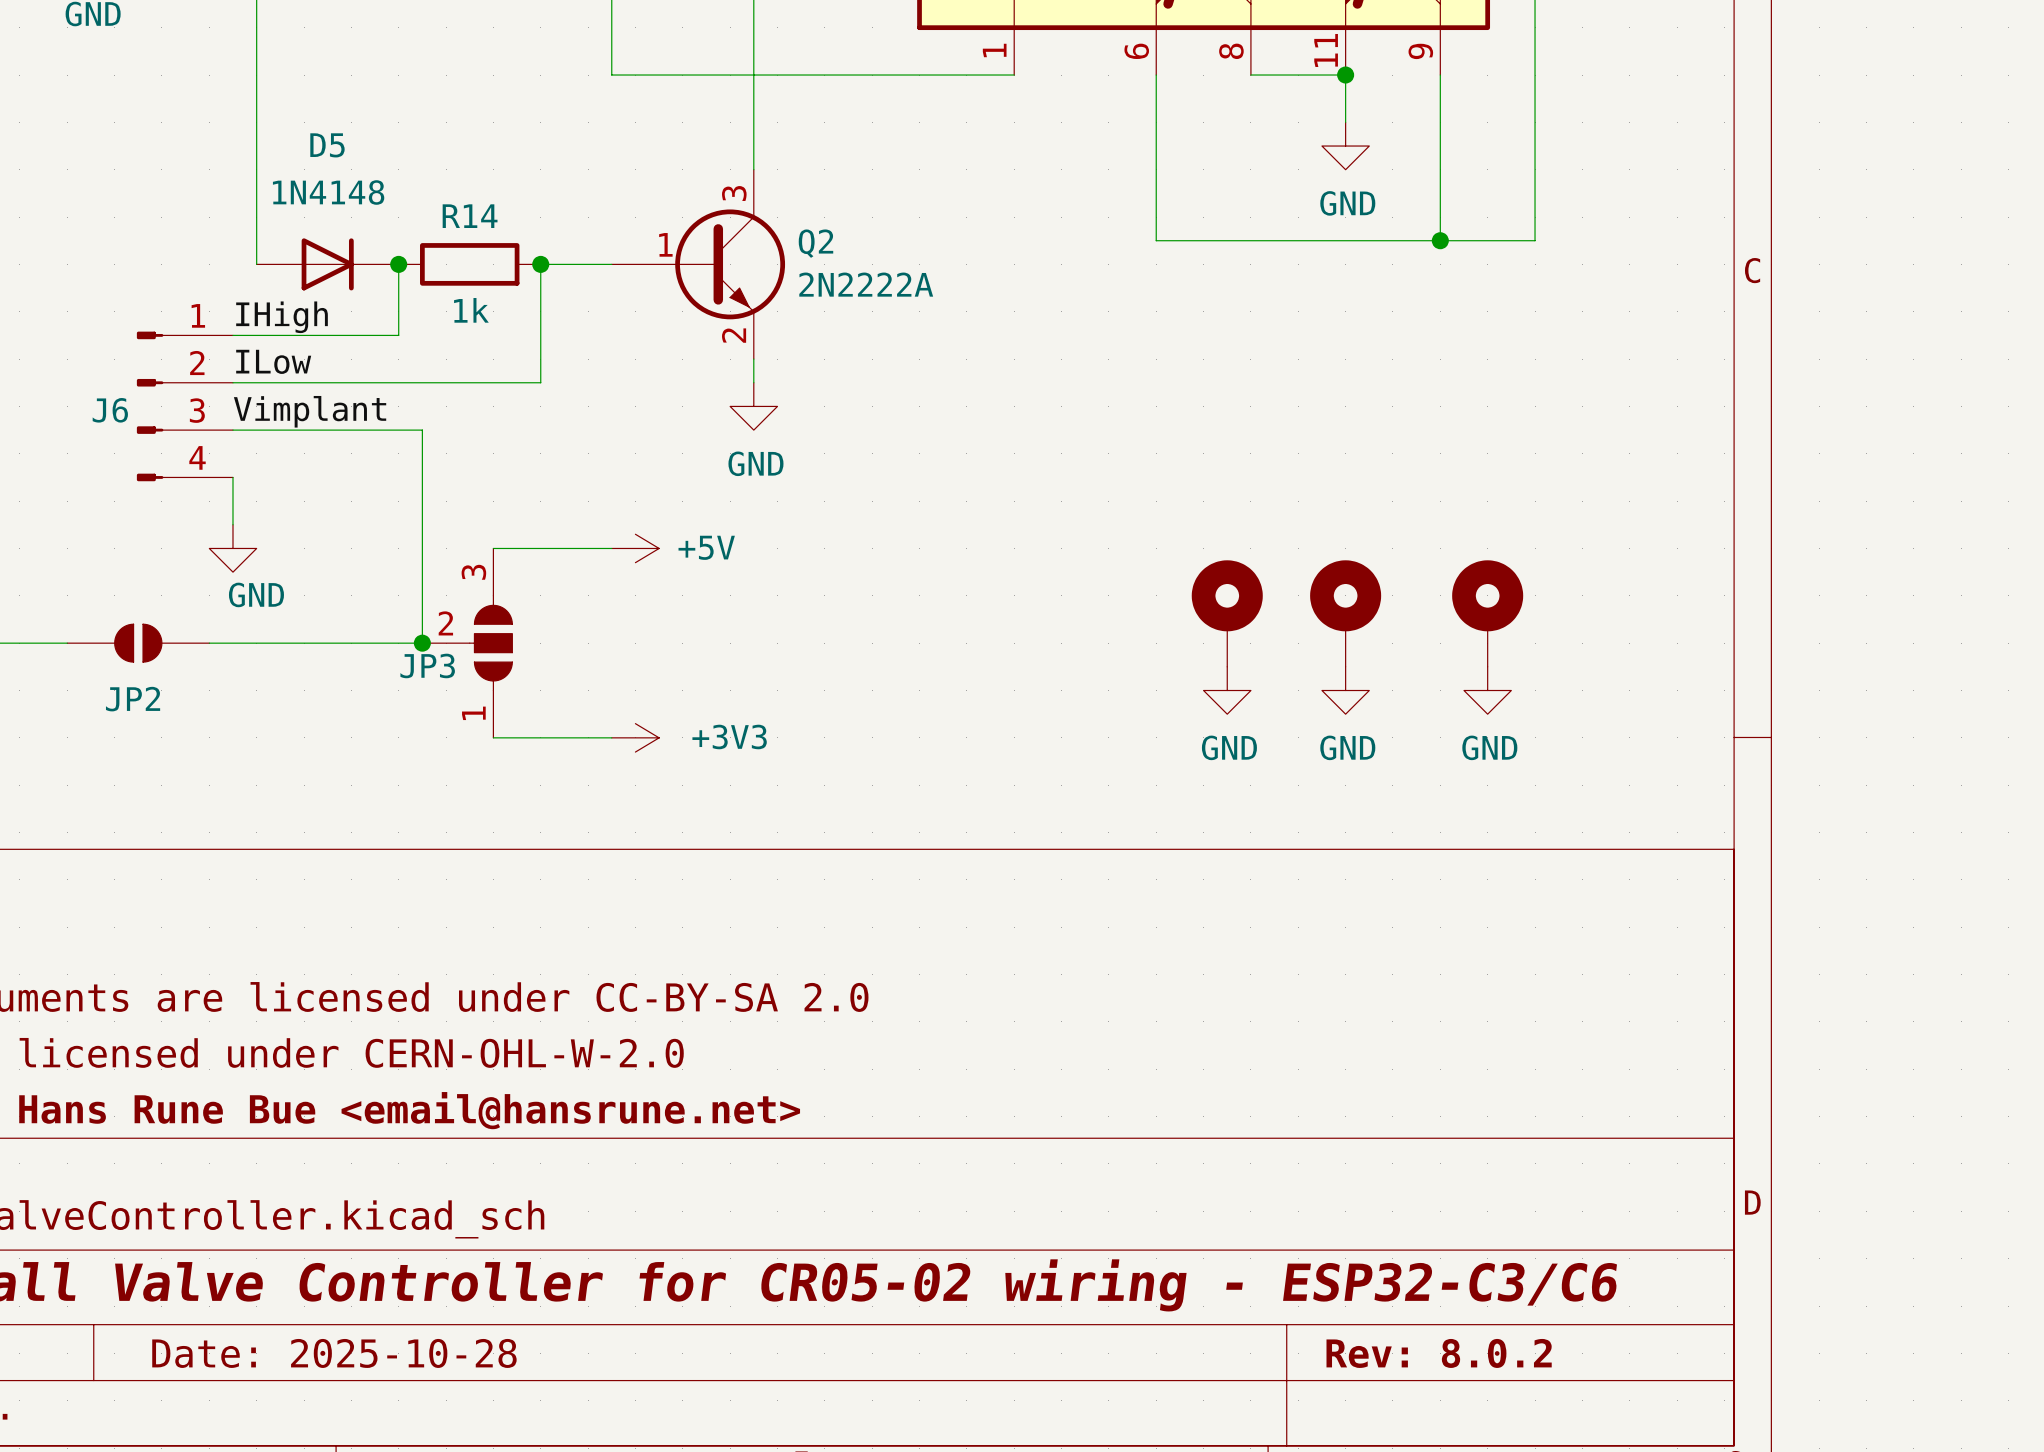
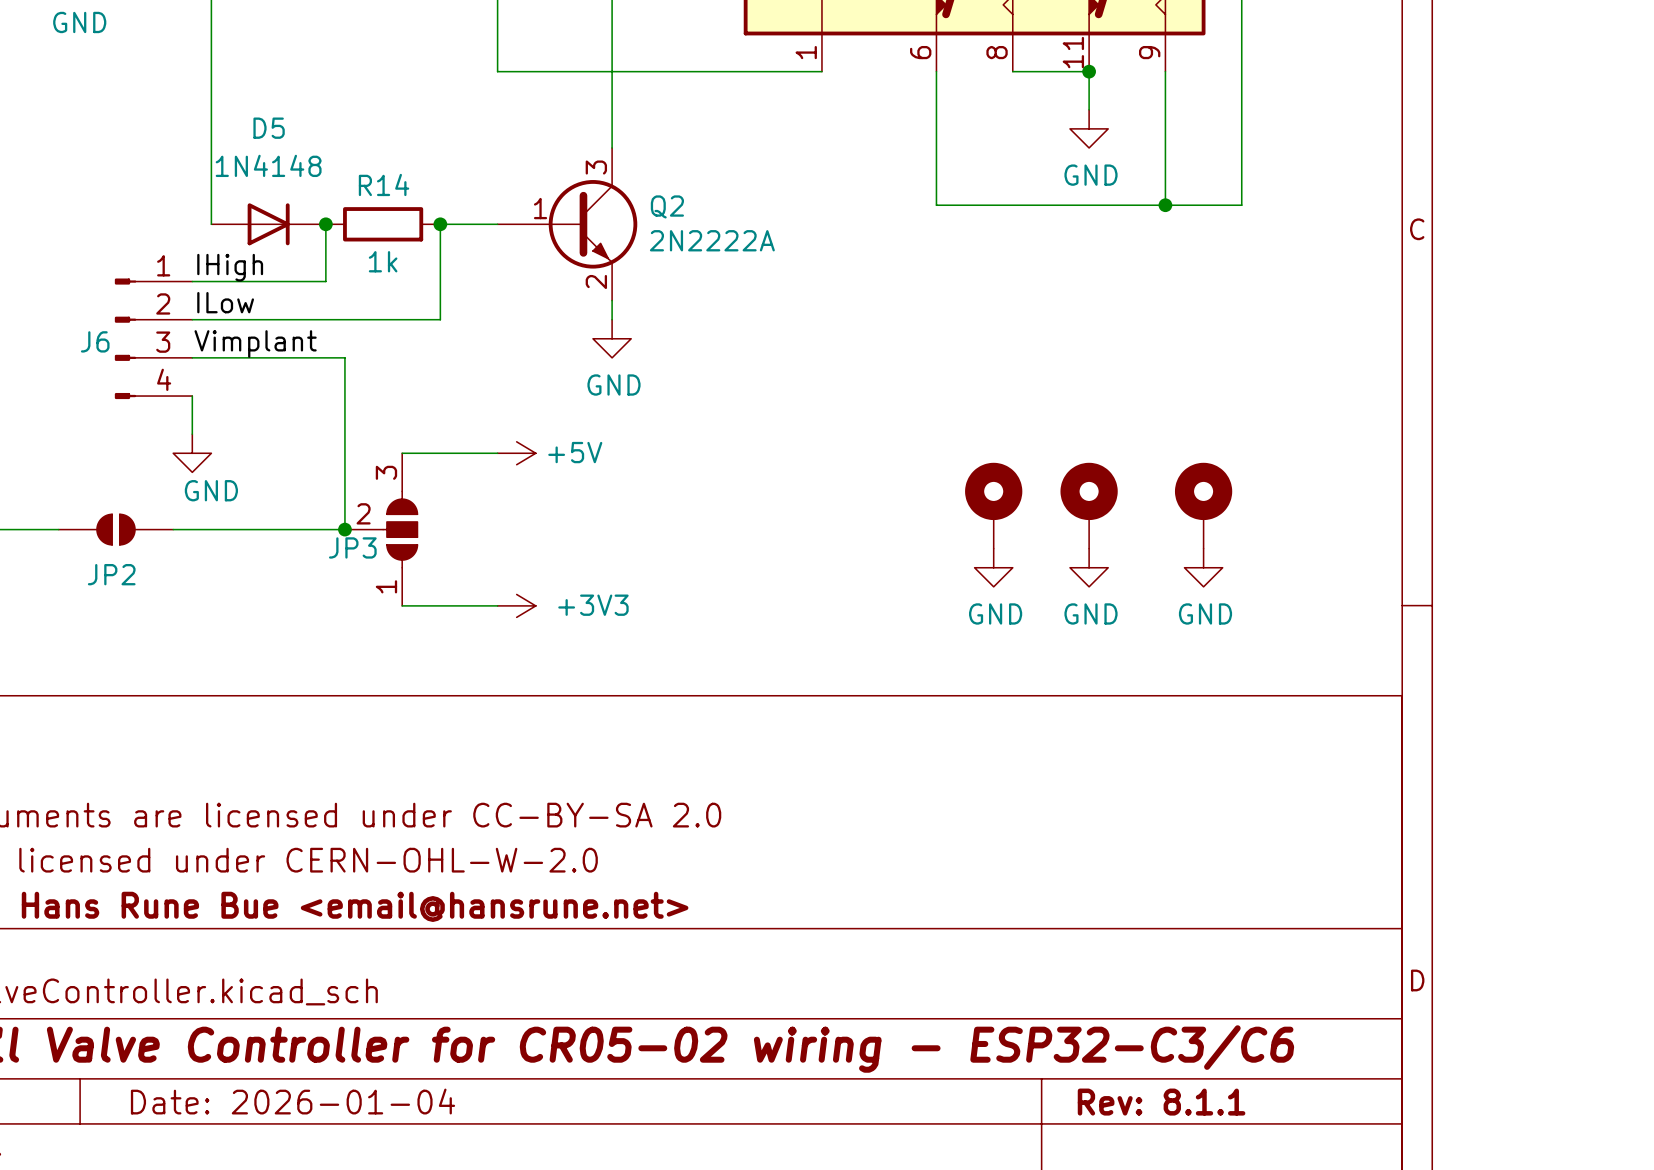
title block: Date: 2025-10-28 (334, 1353) -> Date: 2026-01-04 (292, 1101)
title block: Rev: 8.0.2 (1439, 1353) -> Rev: 8.1.1 (1161, 1102)

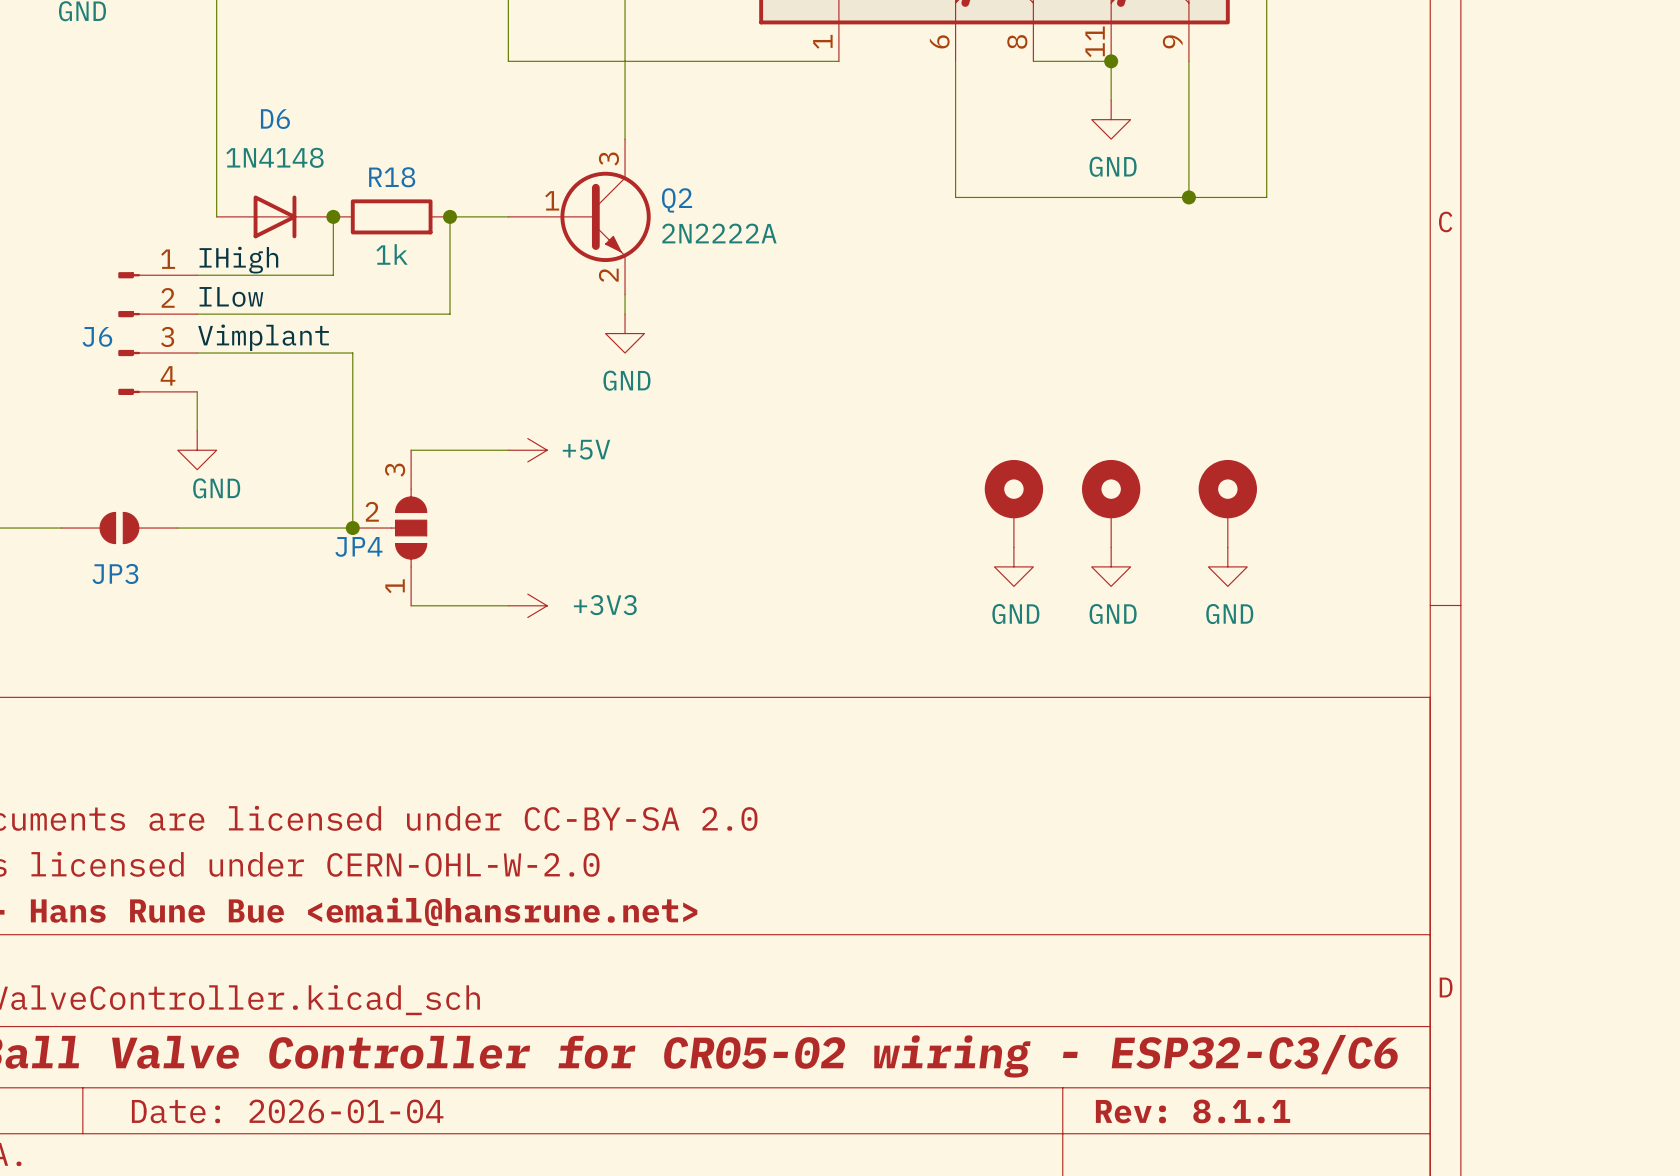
D5 name: D5 (269, 128) -> D6 (275, 119)
R14 name: R14 (384, 184) -> R18 (392, 177)
JP3 name: JP3 (352, 547) -> JP4 (358, 546)
JP2 name: JP2 (111, 574) -> JP3 (115, 573)

